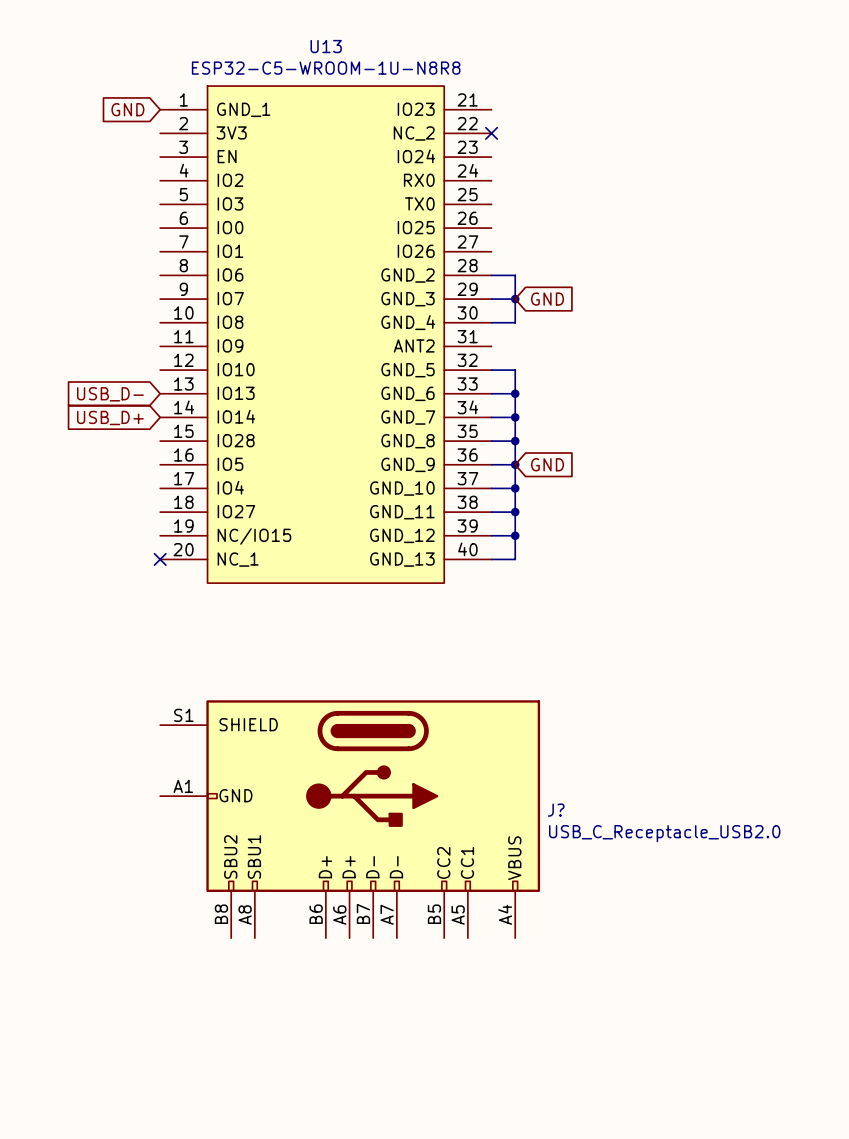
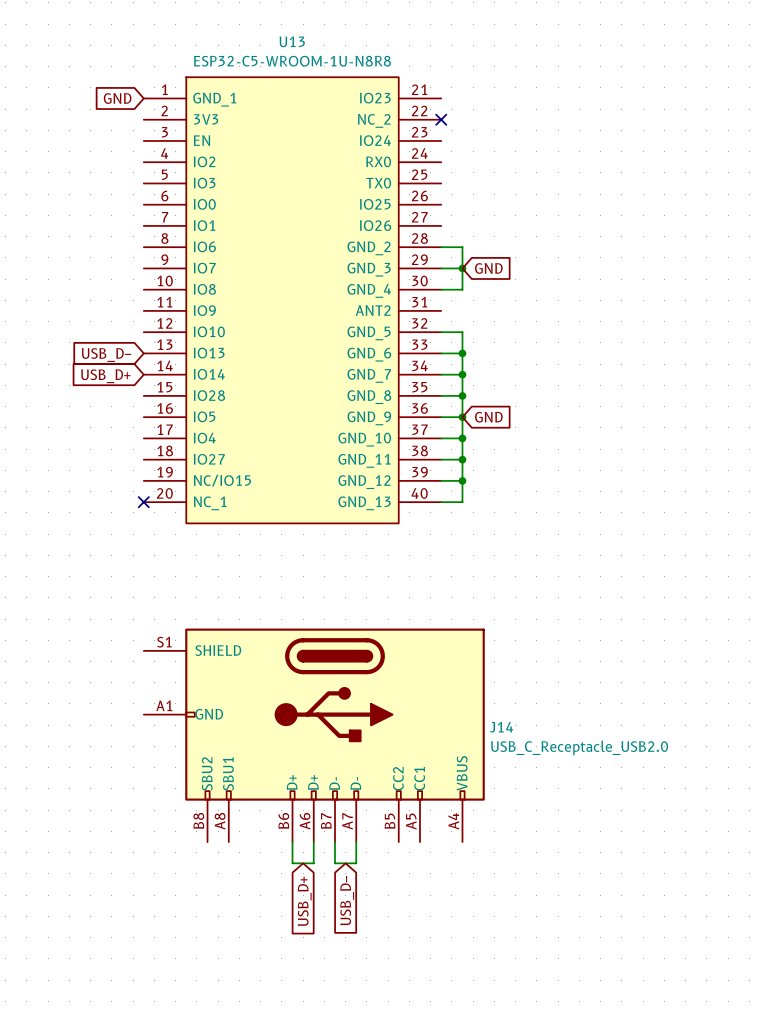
J? name: J? (556, 810) -> J14 (501, 727)
wire: none -> (292, 842) (292, 863) (313, 863) (313, 842)
wire: none -> (335, 842) (335, 863) (356, 863) (356, 842)
global label: none -> USB_D+ (304, 901)
global label: none -> USB_D− (347, 900)

